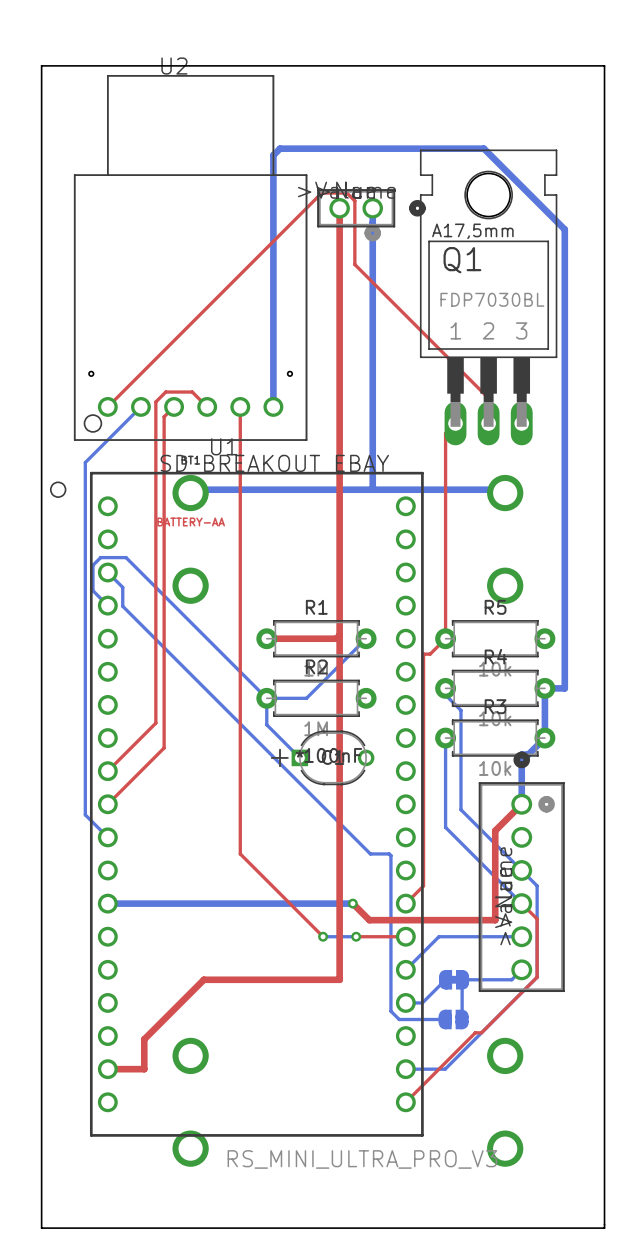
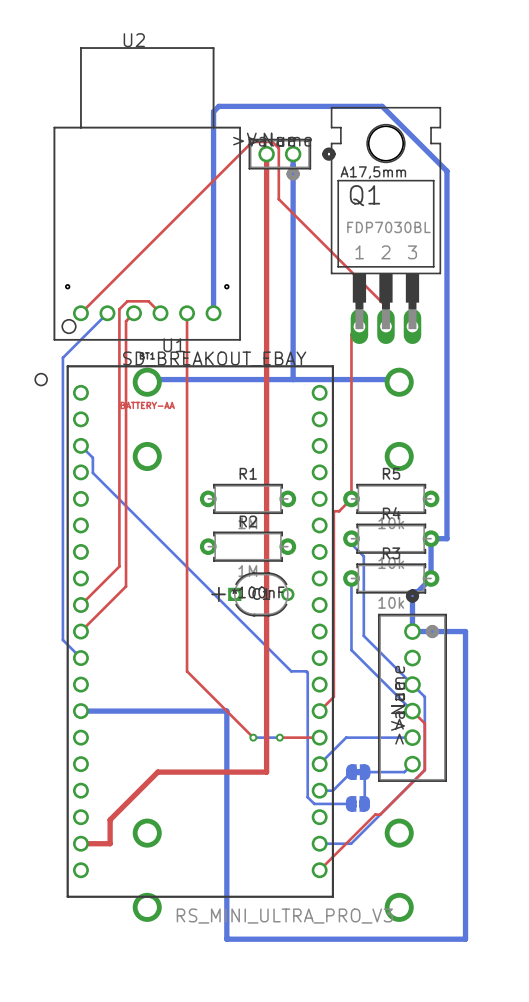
board edge: (41, 65) (41, 1228) (604, 1228) (604, 65) (41, 65) -> none
bottom track: (107, 605) (92, 590) (92, 565) (100, 557) (126, 557) (266, 698) -> none
top track: (339, 635) (336, 638) (266, 638) -> none
bottom track: (366, 638) (306, 698) (266, 698) -> none
bottom track: (266, 698) (266, 724) (299, 757) -> none
top track: (521, 804) (495, 830) (495, 920) (369, 920) (352, 903) -> none
bottom track: (289, 903) (352, 903) -> (226, 711) (226, 939) (465, 939) (465, 631) (412, 631)
via: (352, 903) -> none

